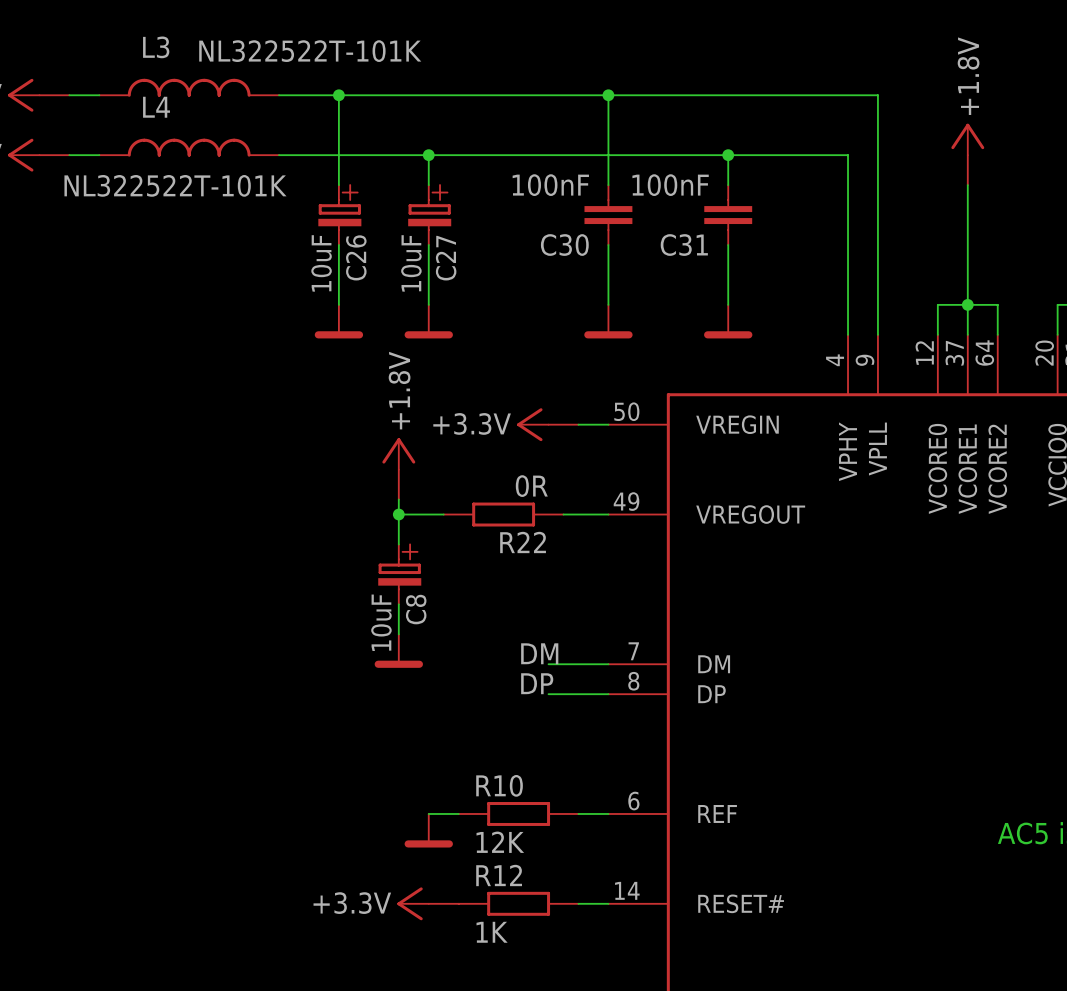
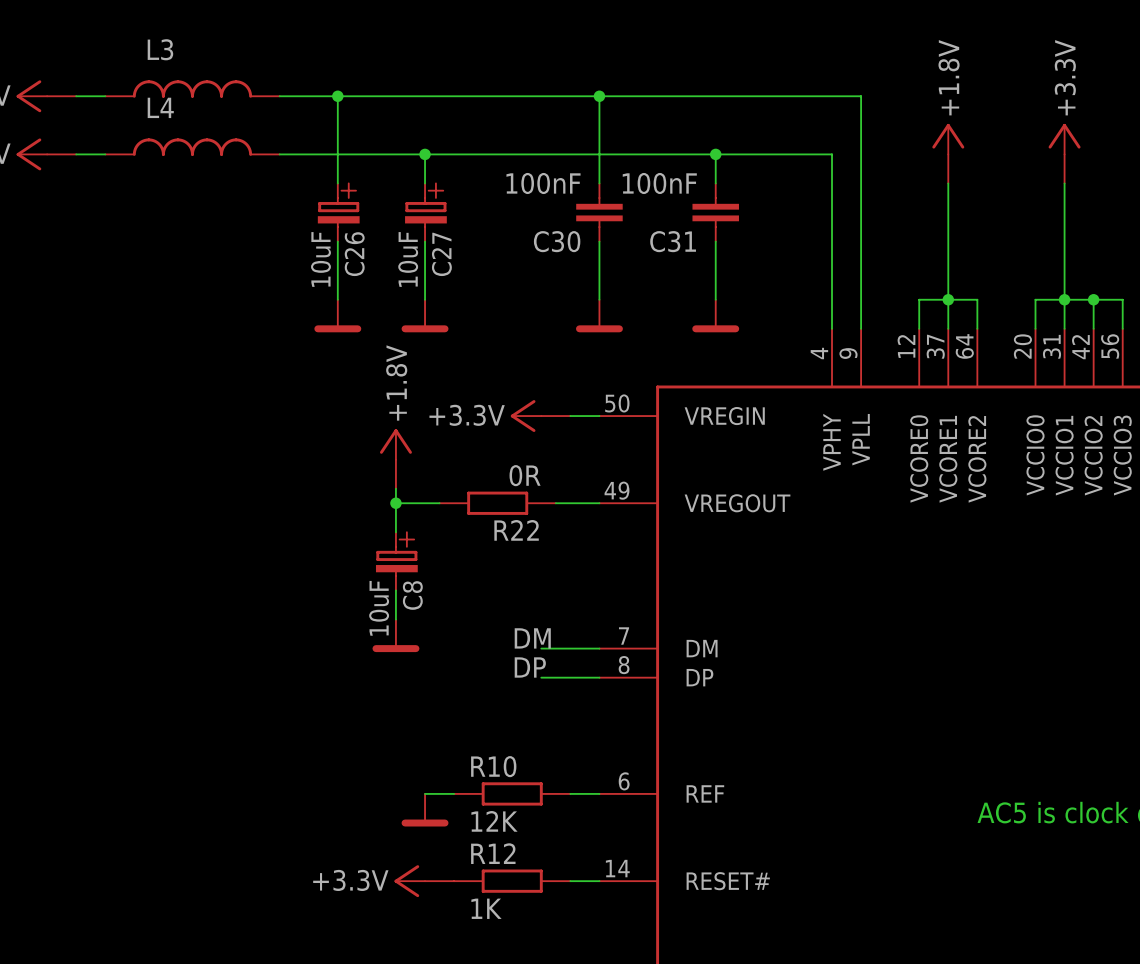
L3 value: NL322522T-101K (310, 51) -> none
L4 value: NL322522T-101K (175, 185) -> none

